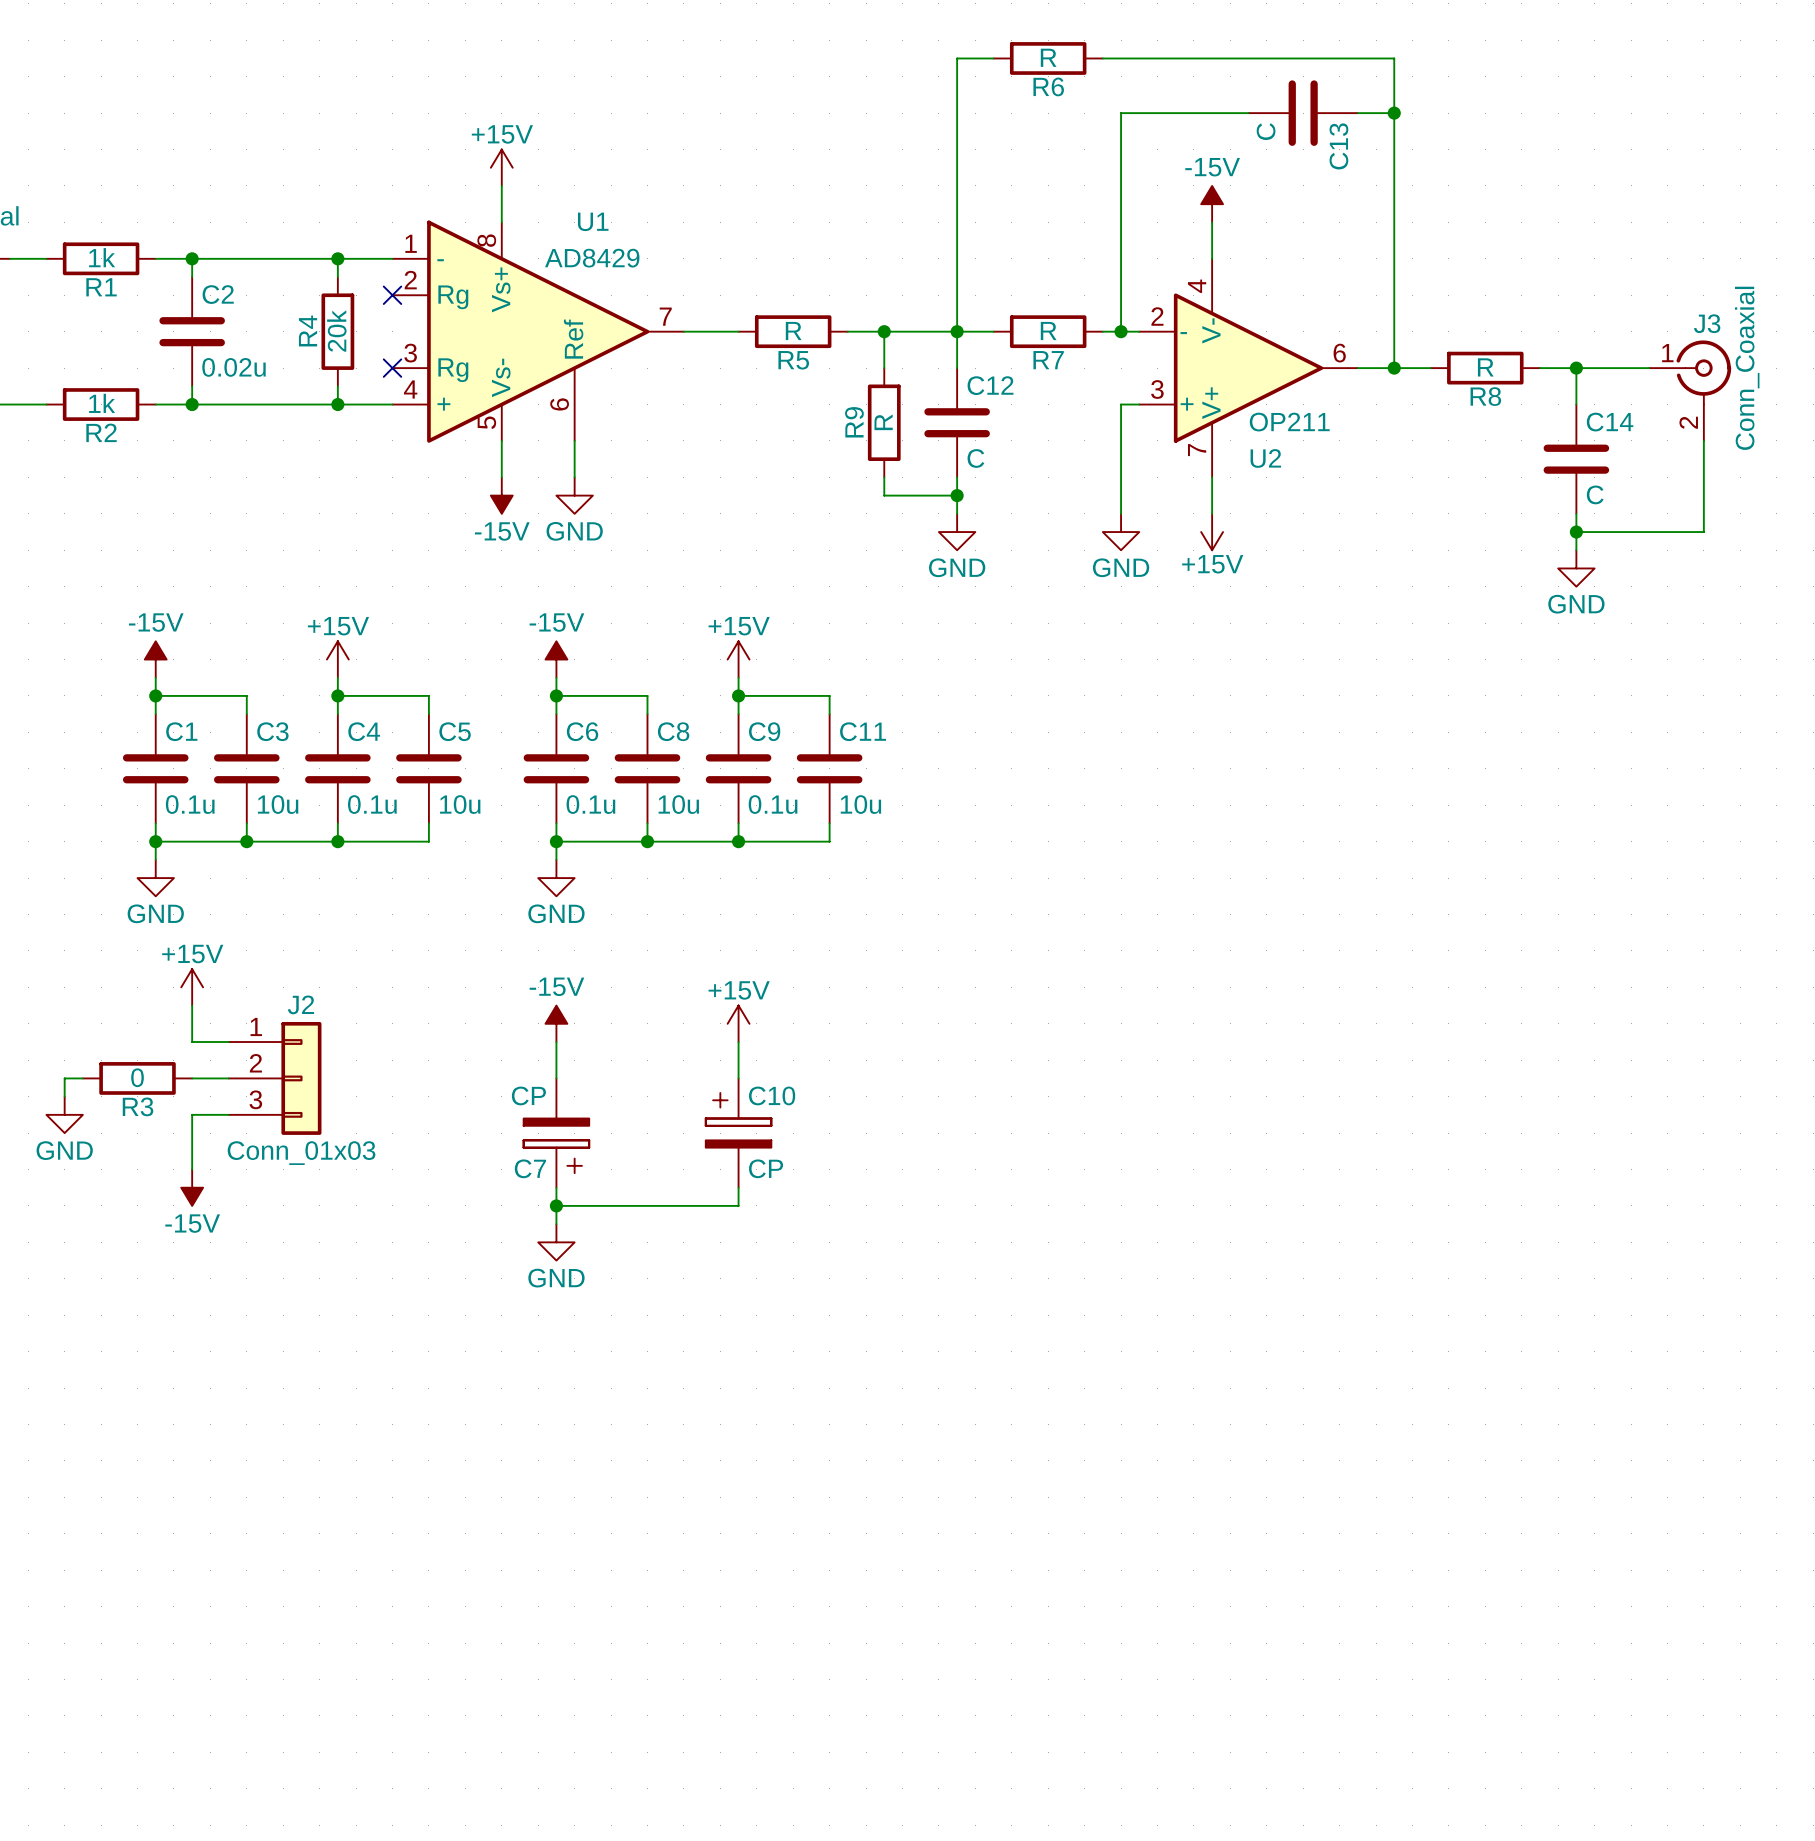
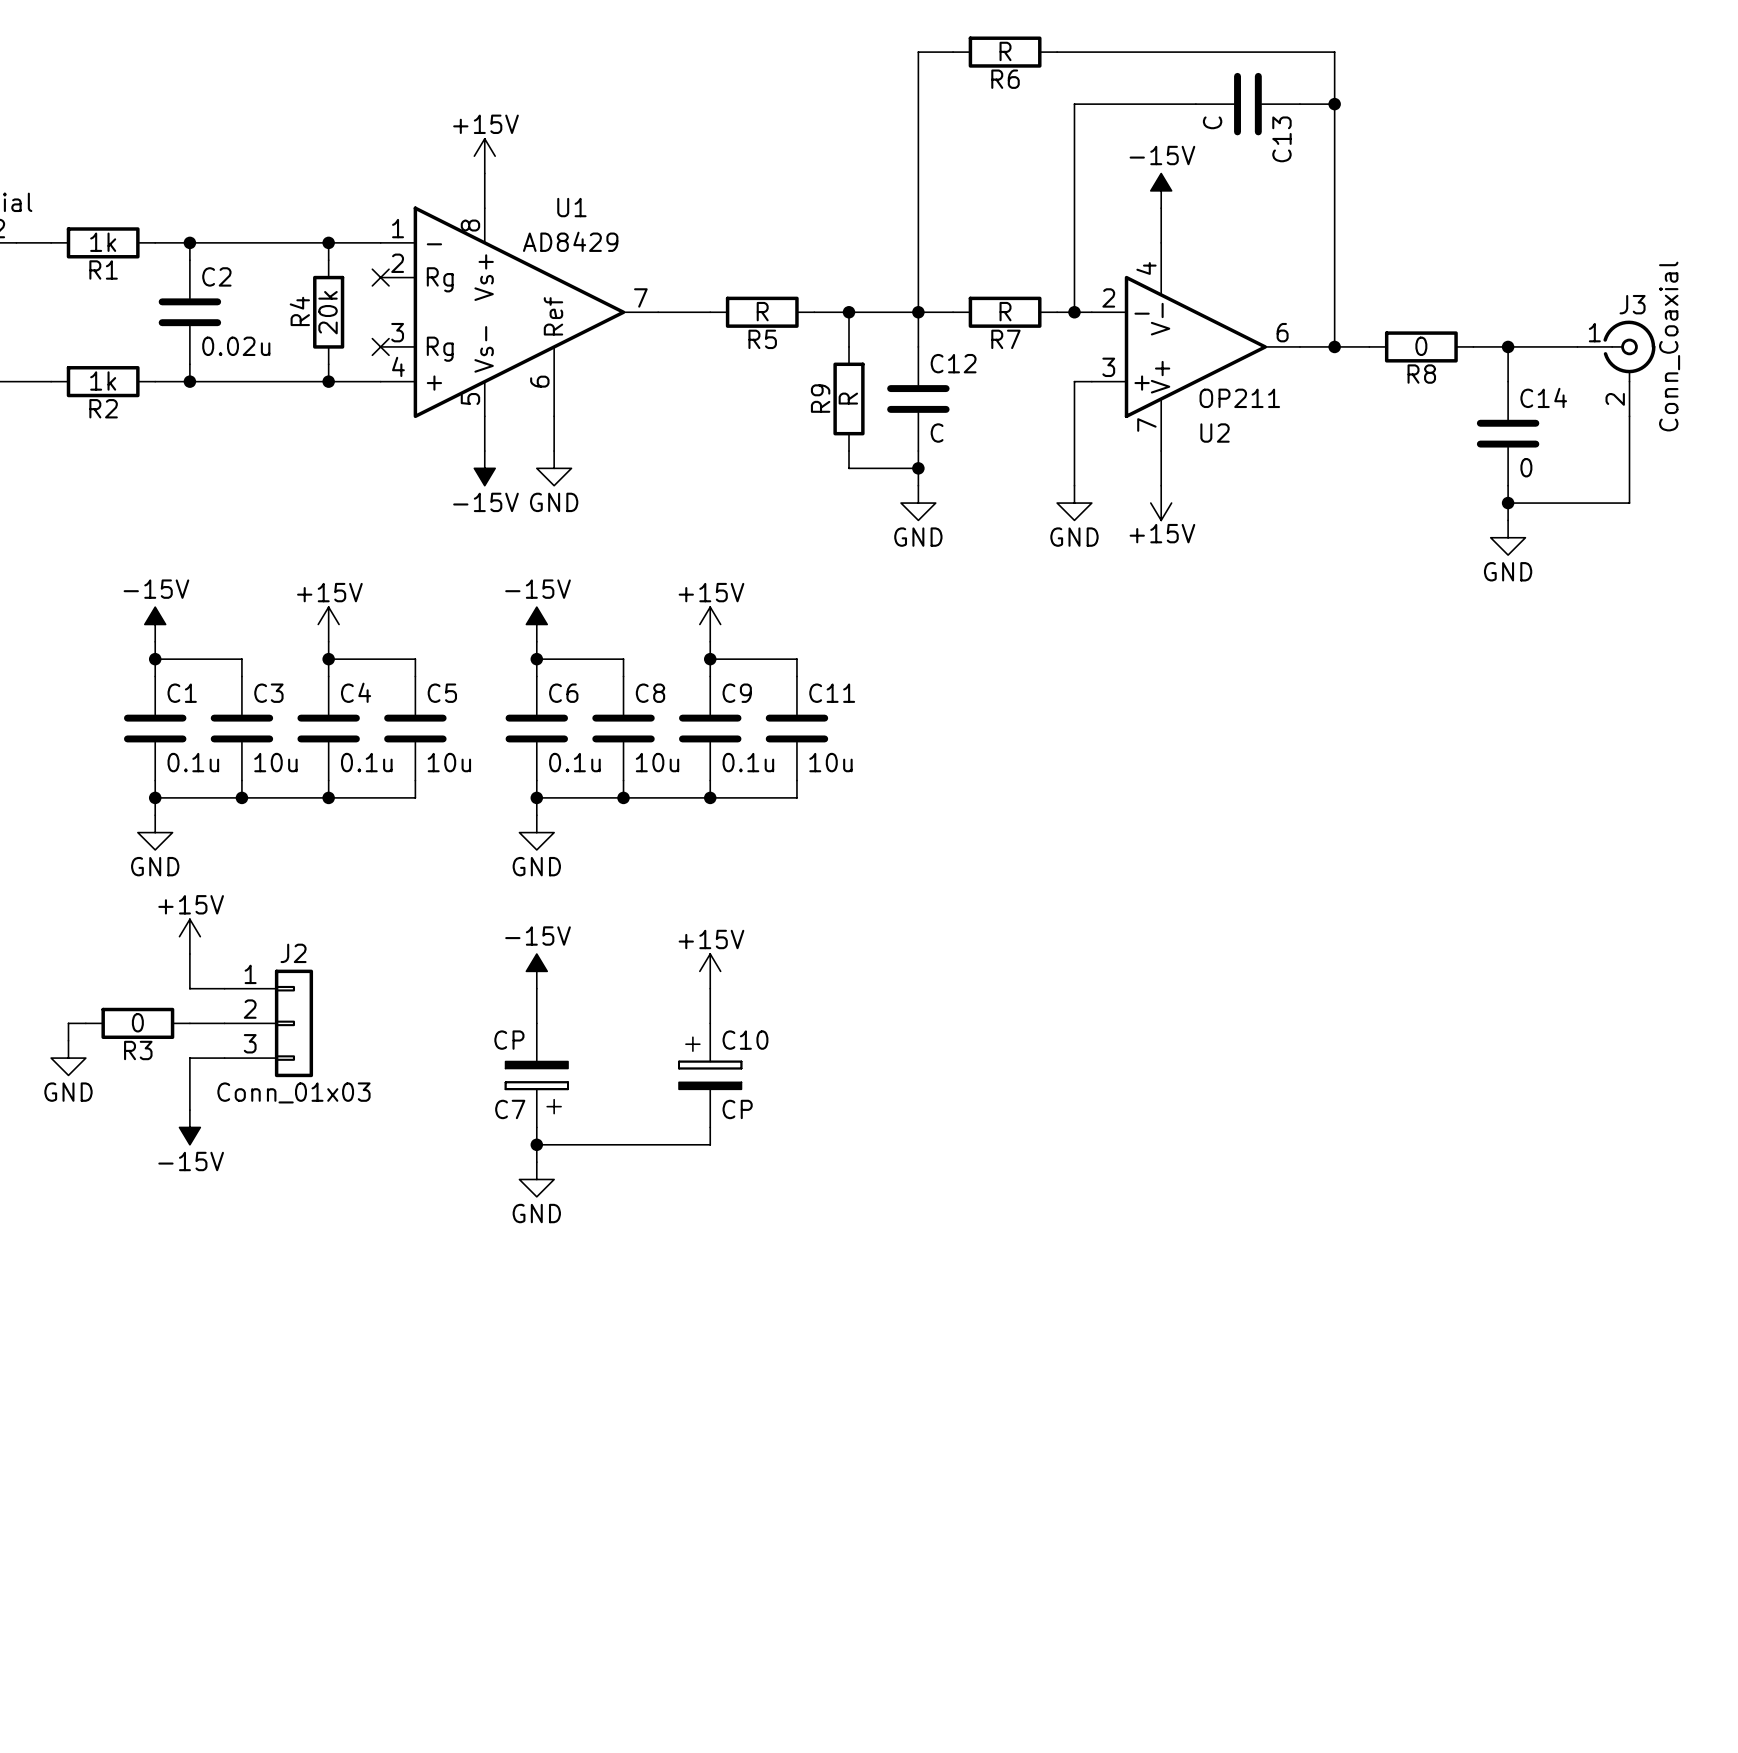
R8 value: R (1485, 367) -> 0 (1421, 346)
C14 value: C (1595, 494) -> 0 (1526, 467)

